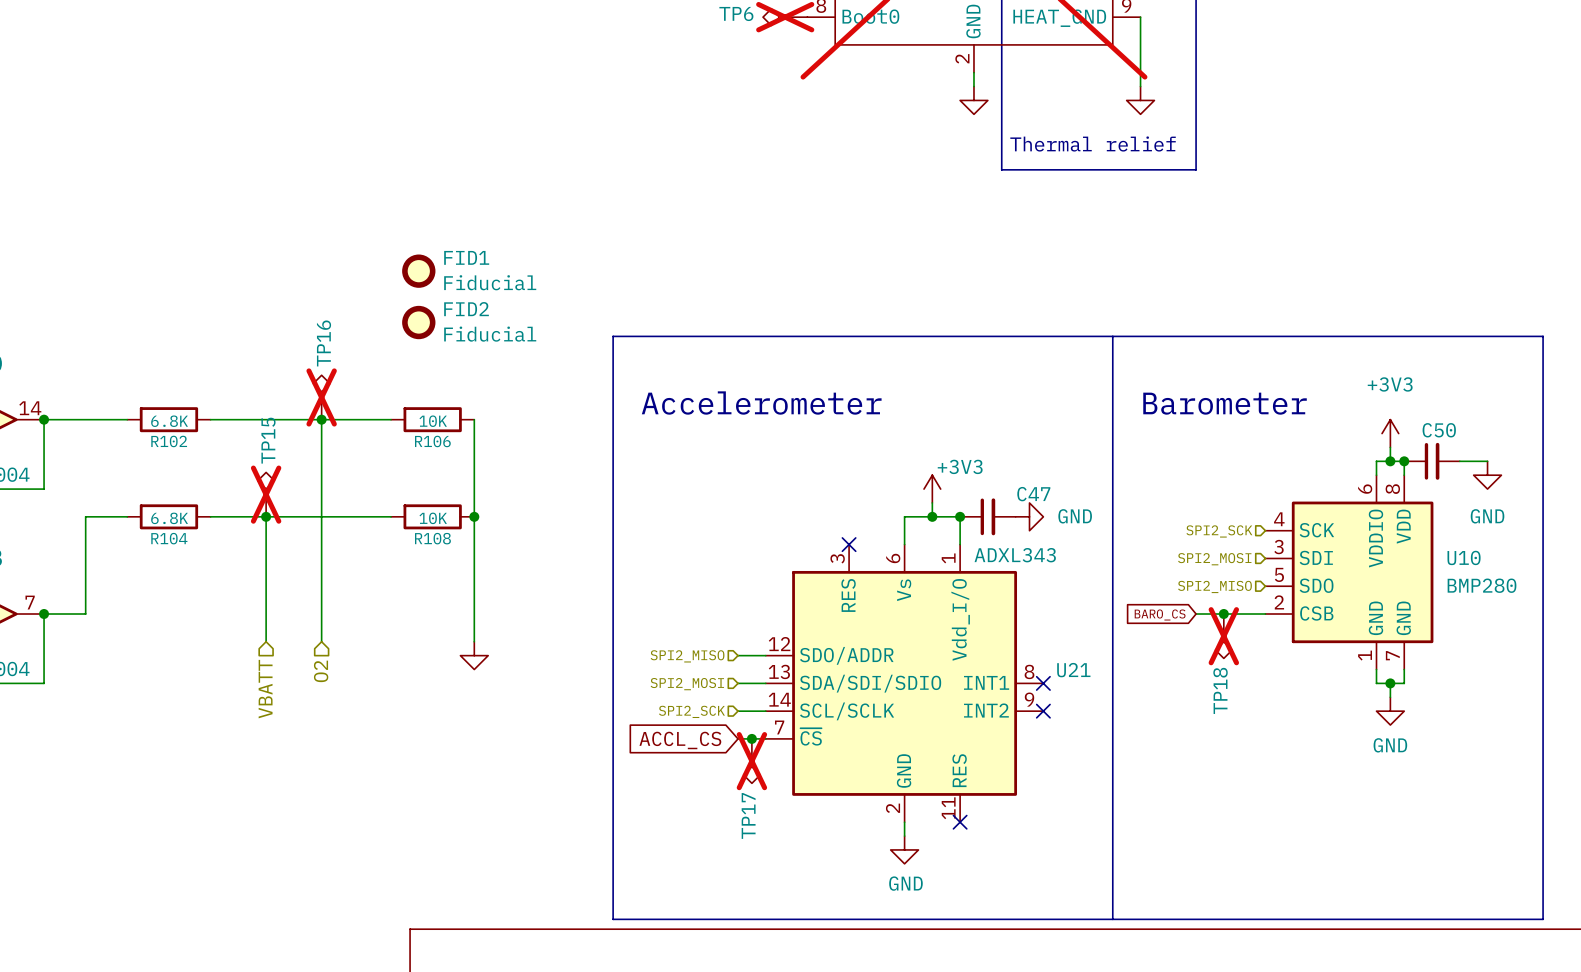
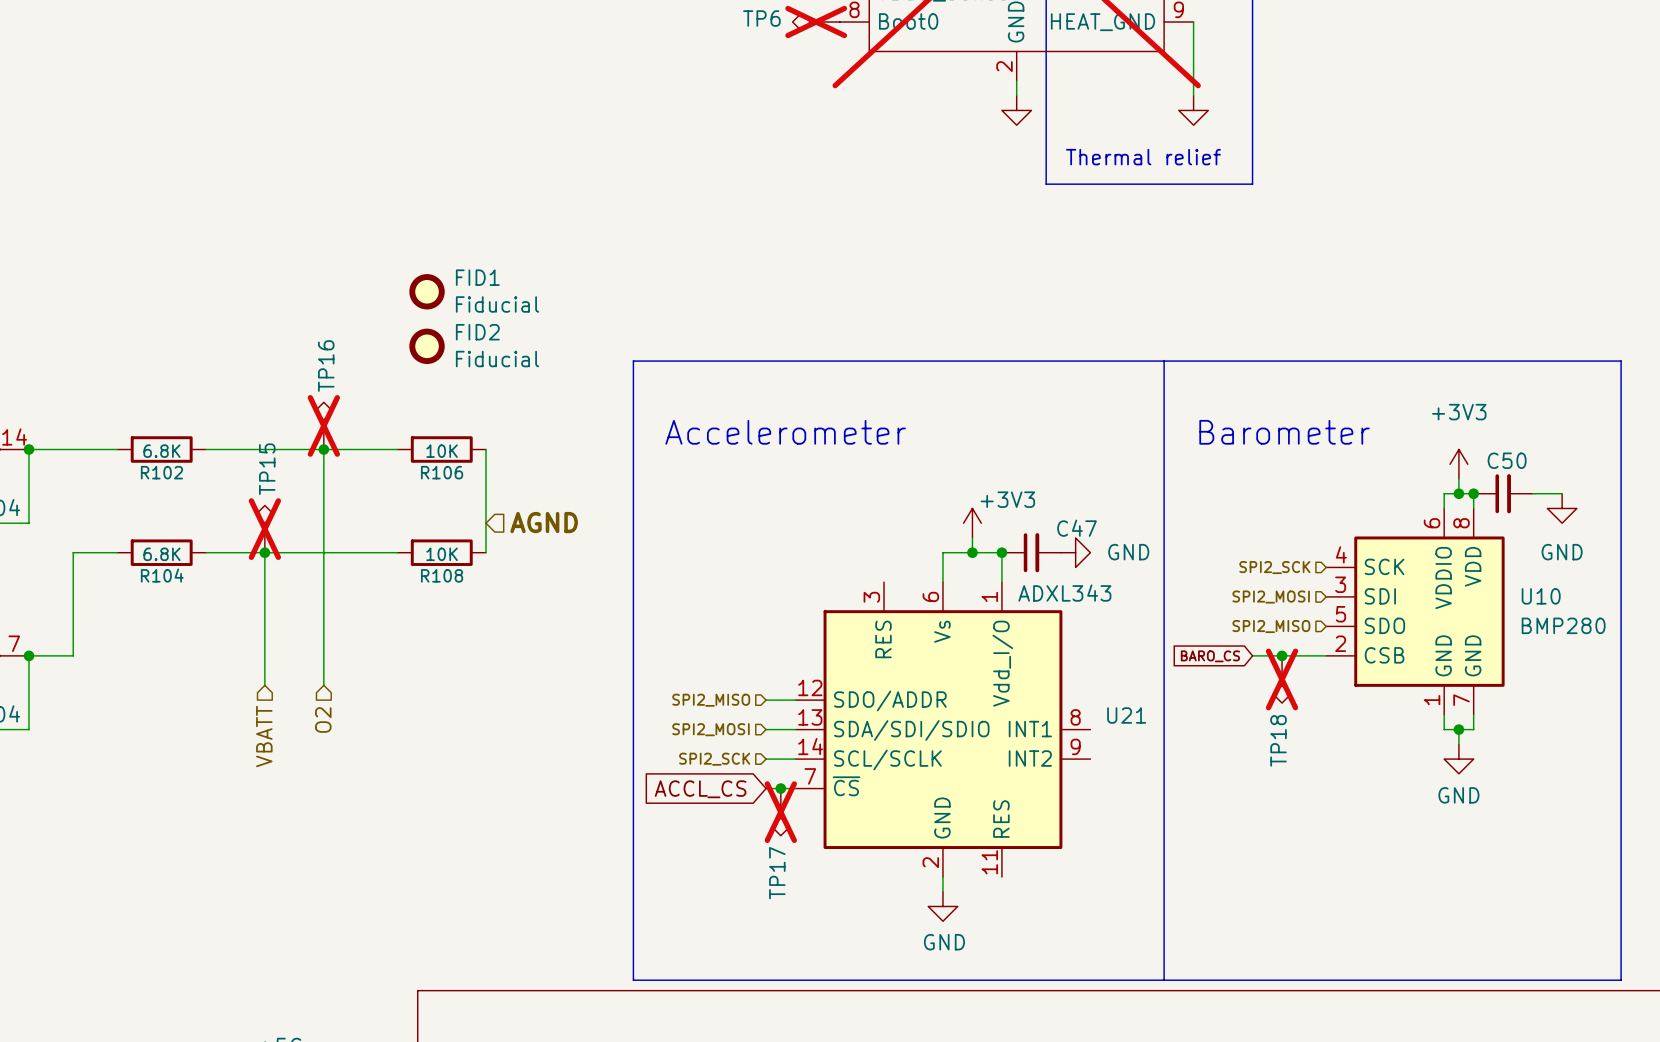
hierarchical label: none -> AGND (544, 522)
wire: (474, 516) (474, 641) -> none
junction: (474, 516) -> none
no-connect mark: (849, 544) -> none
power symbol: (474, 655) -> none
no-connect mark: (1043, 683) -> none
no-connect mark: (1043, 711) -> none
no-connect mark: (960, 822) -> none

